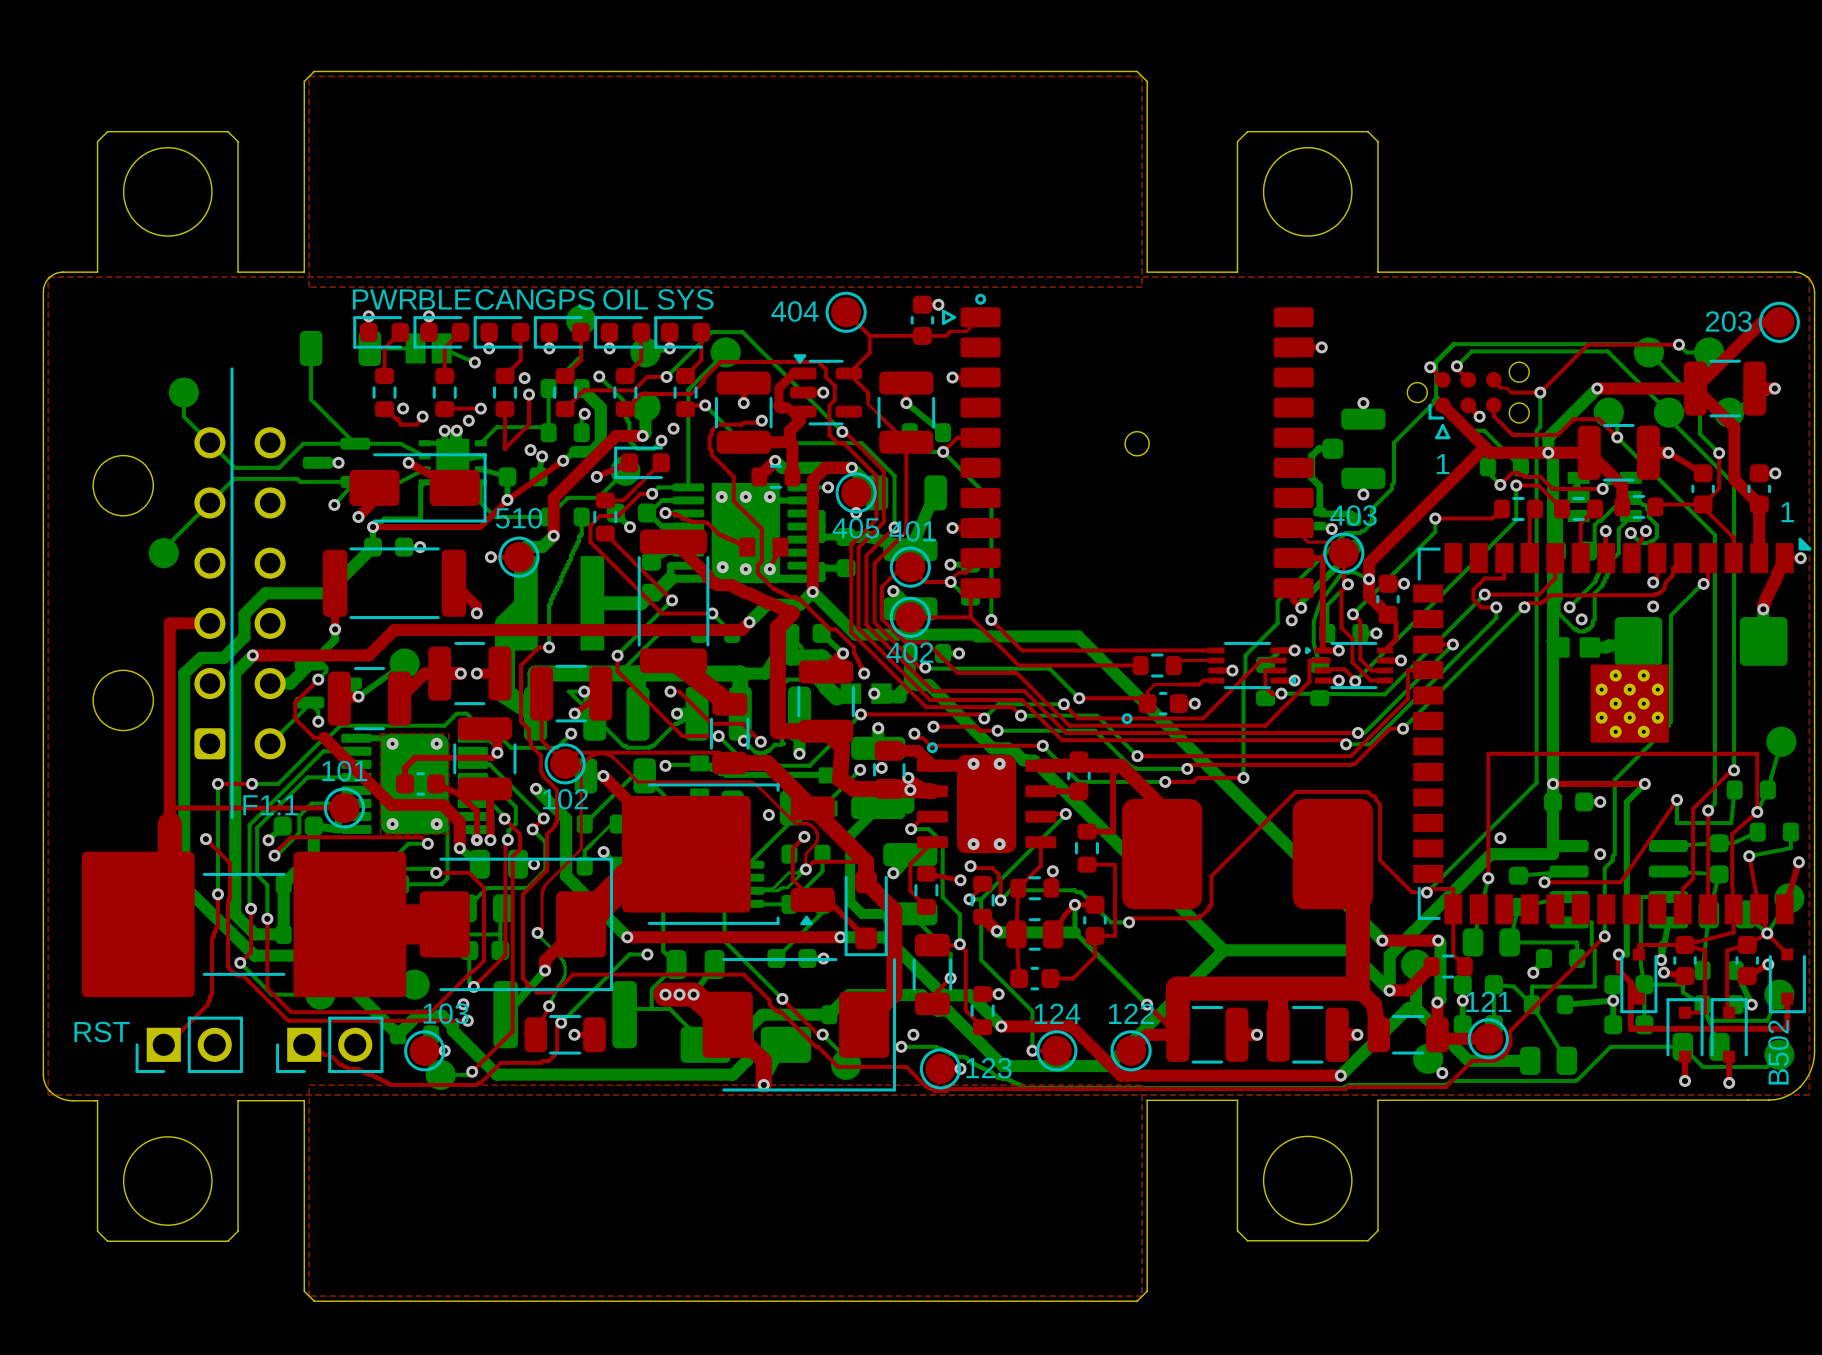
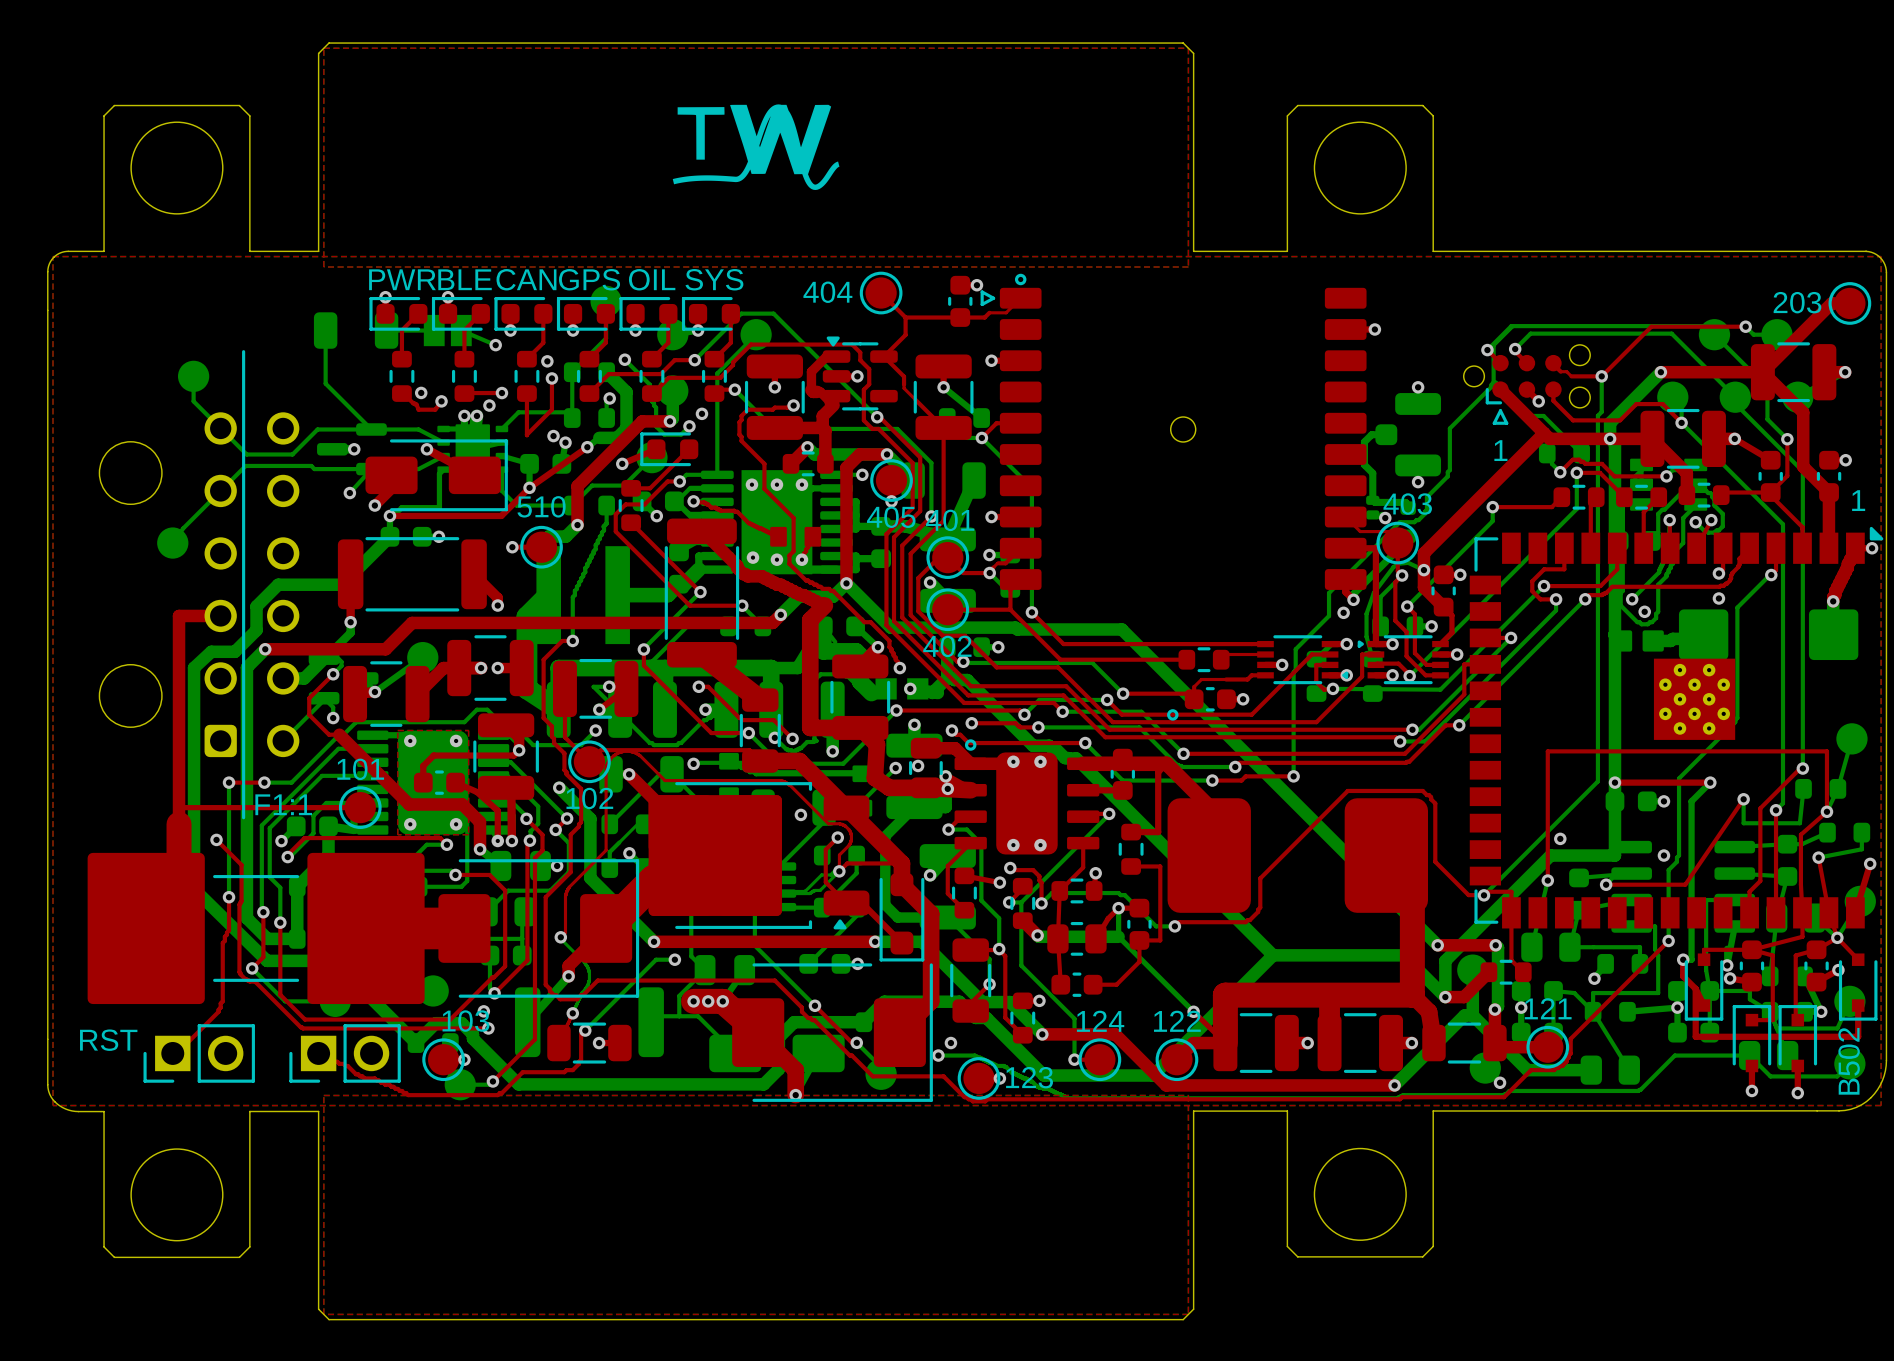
drawing: none -> [672, 104, 840, 191]

